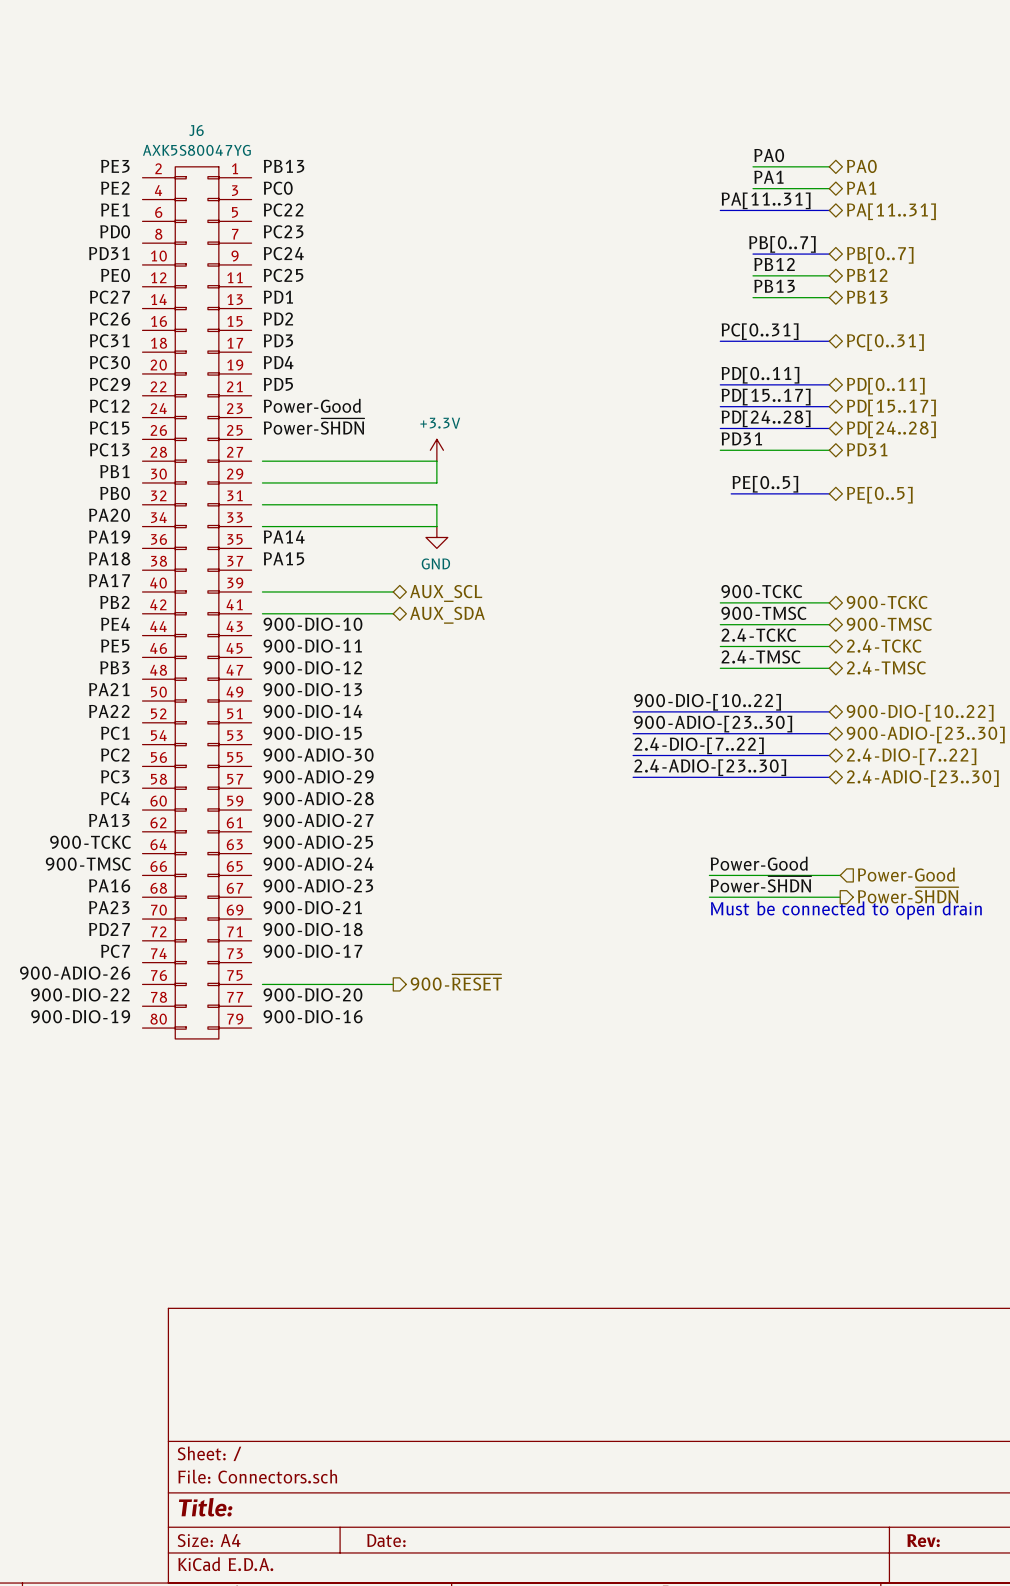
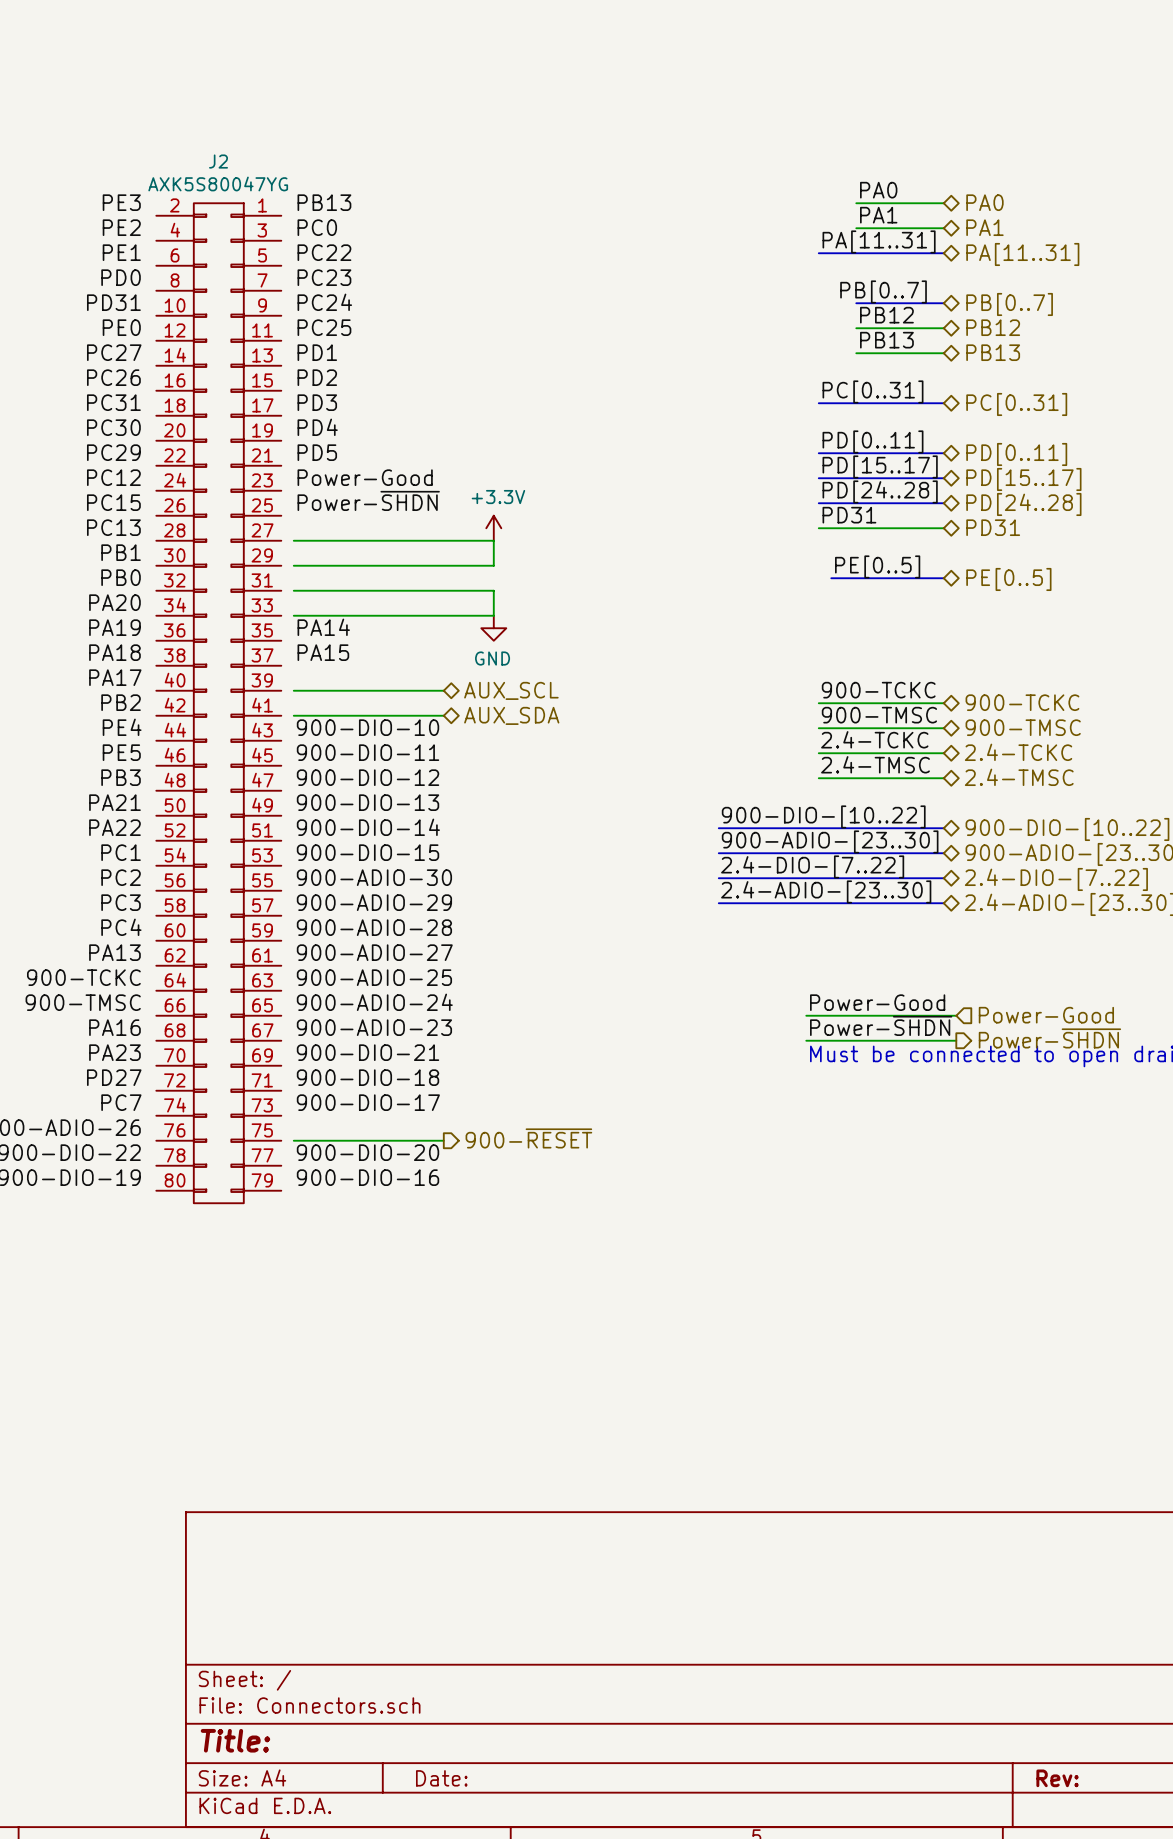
J6 name: J6 (196, 130) -> J2 (218, 161)

